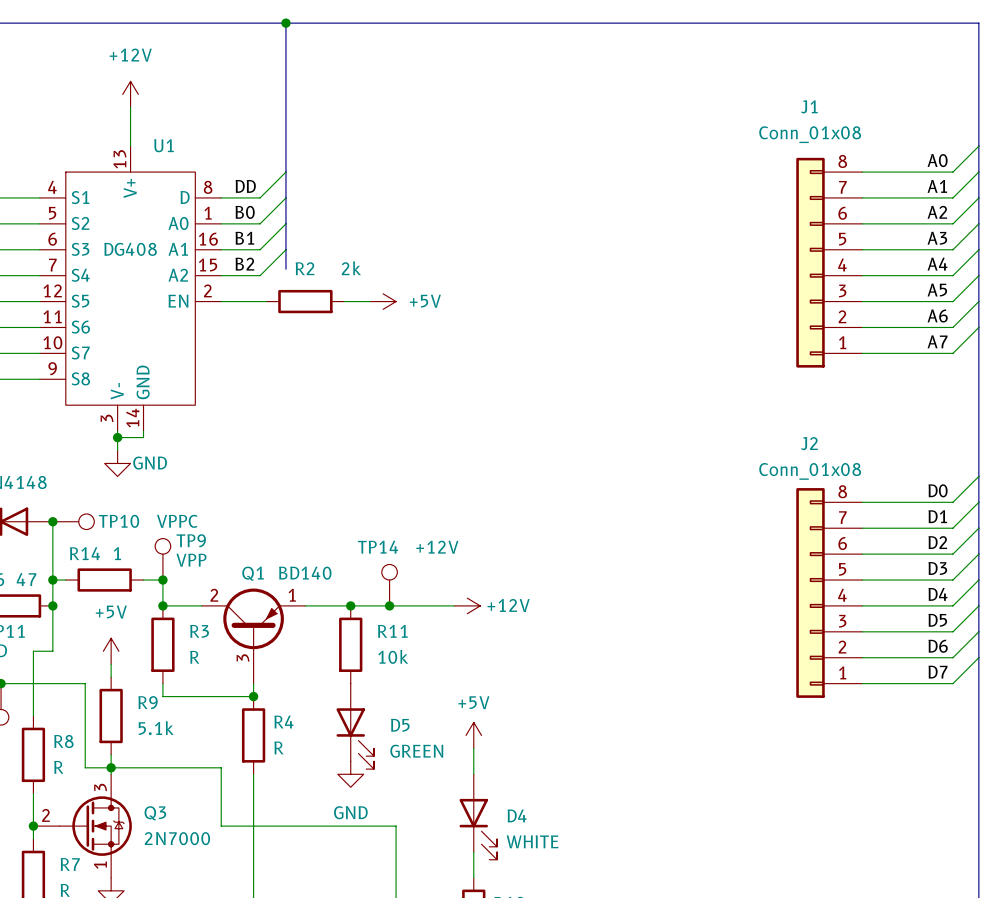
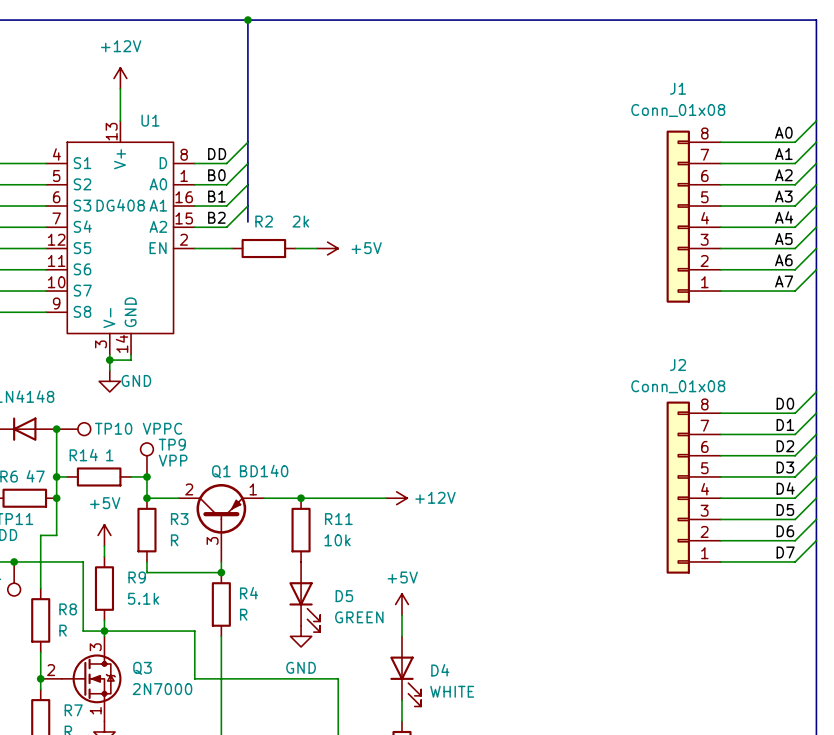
TP14: +12V (389, 585) -> none
junction: (389, 605) -> none

